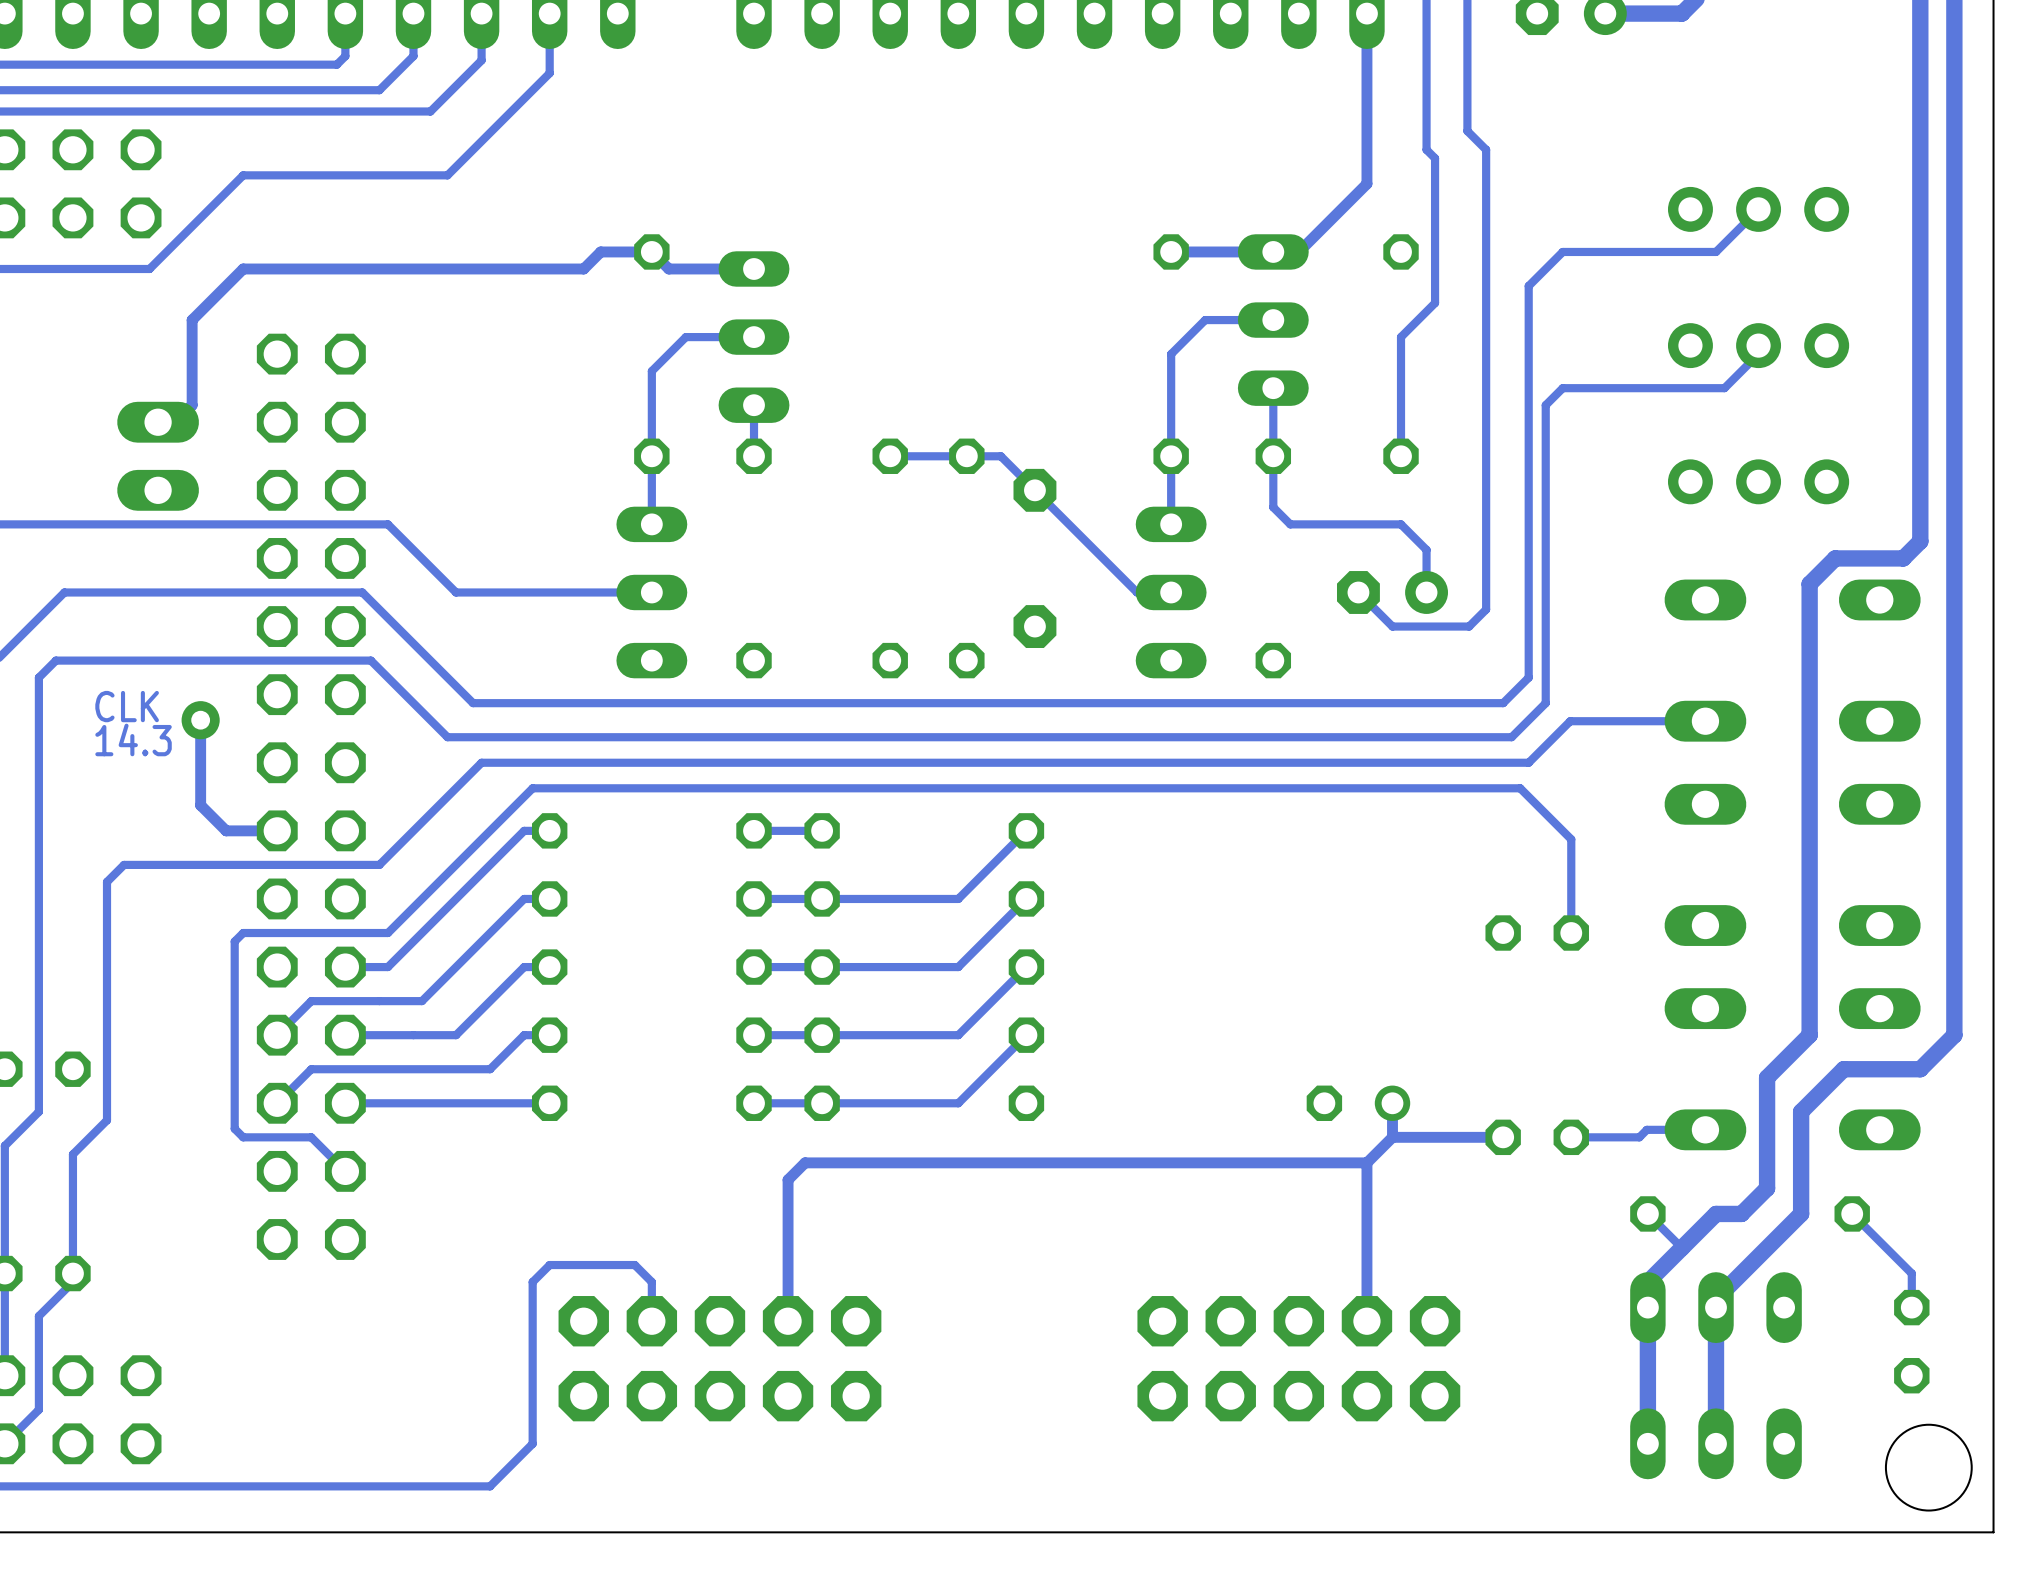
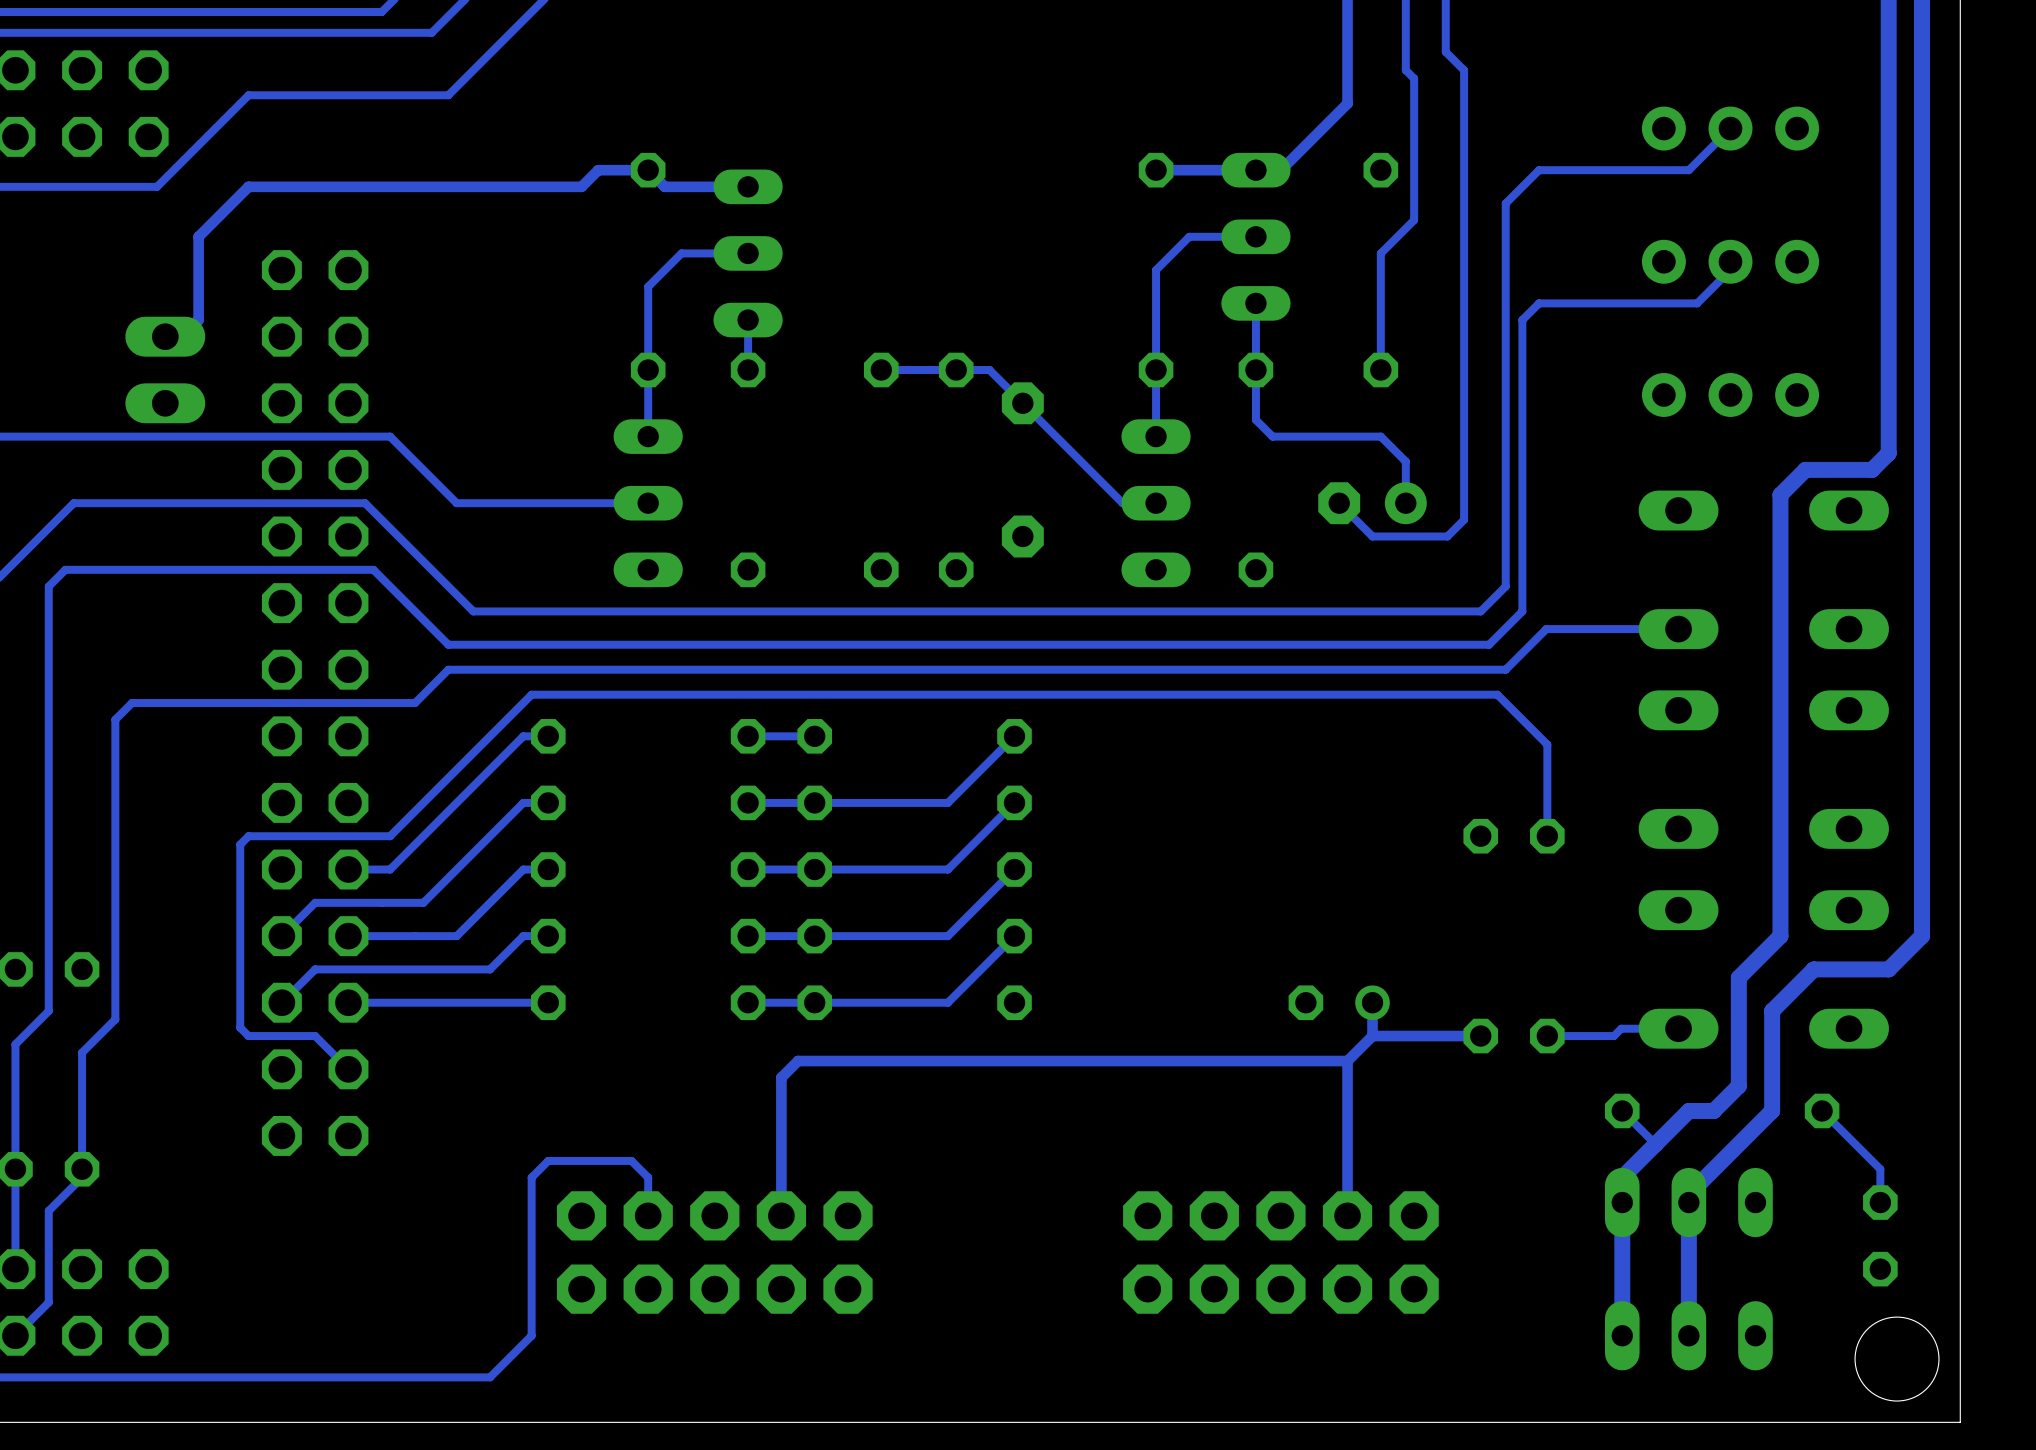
text: CLK (127, 706) -> none
track: (200, 720) (200, 805) (226, 830) (277, 830) -> none
via: (200, 720) -> none
text: 14.3 (133, 739) -> none
track: (481, 762) (379, 864) (124, 864) (107, 881) -> (481, 669) (448, 669) (415, 703) (132, 703) (115, 719) (115, 786)

